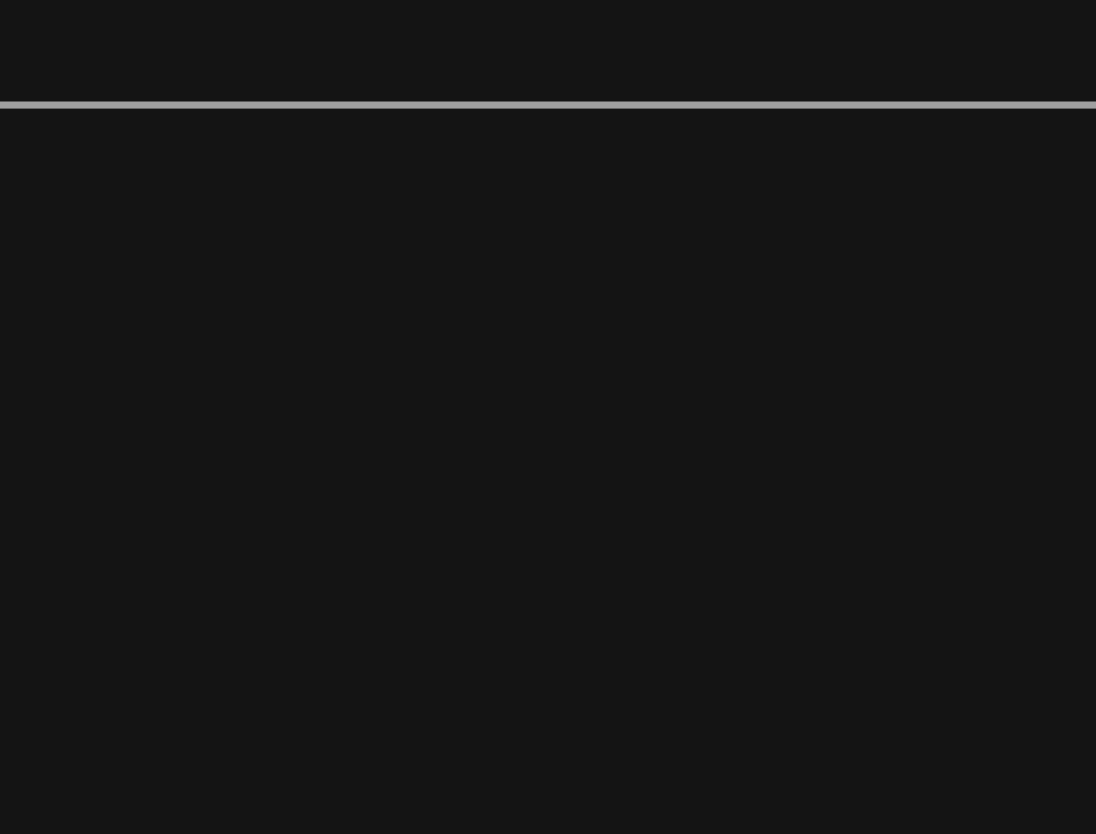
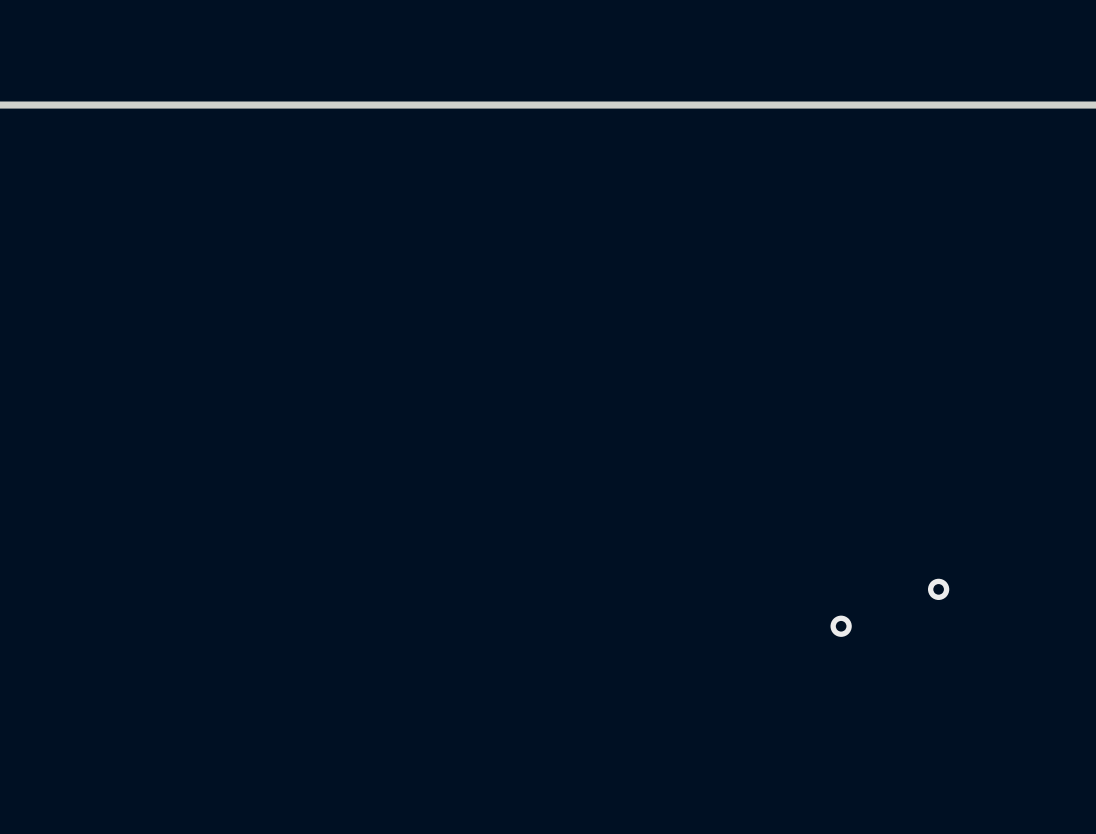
via: none -> (938, 589)
via: none -> (841, 626)

